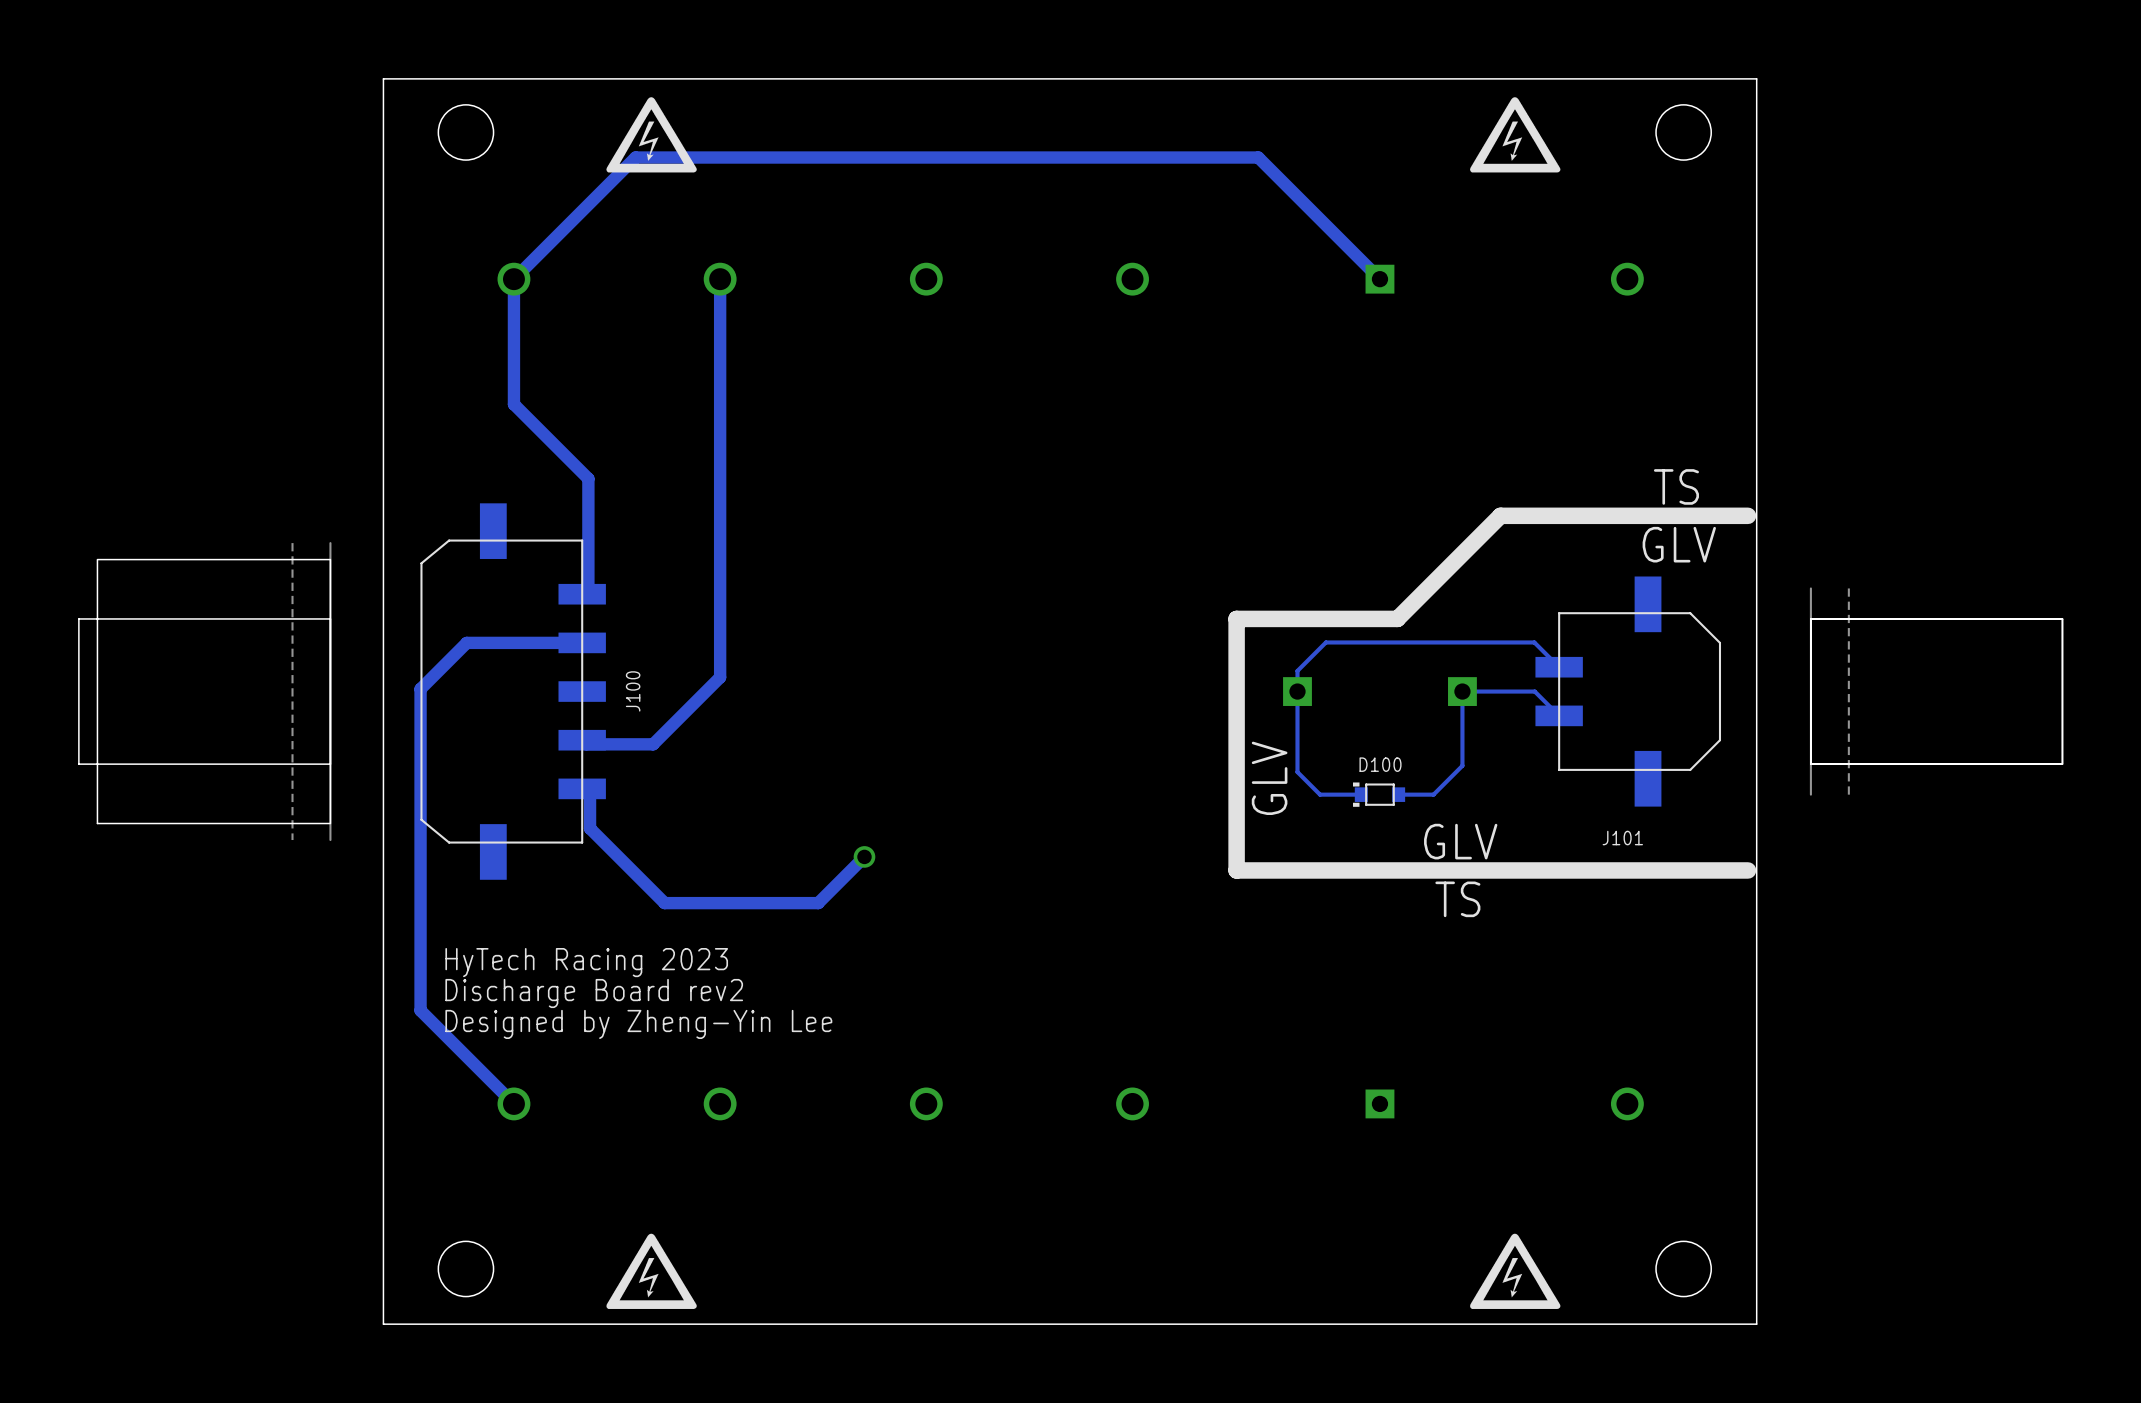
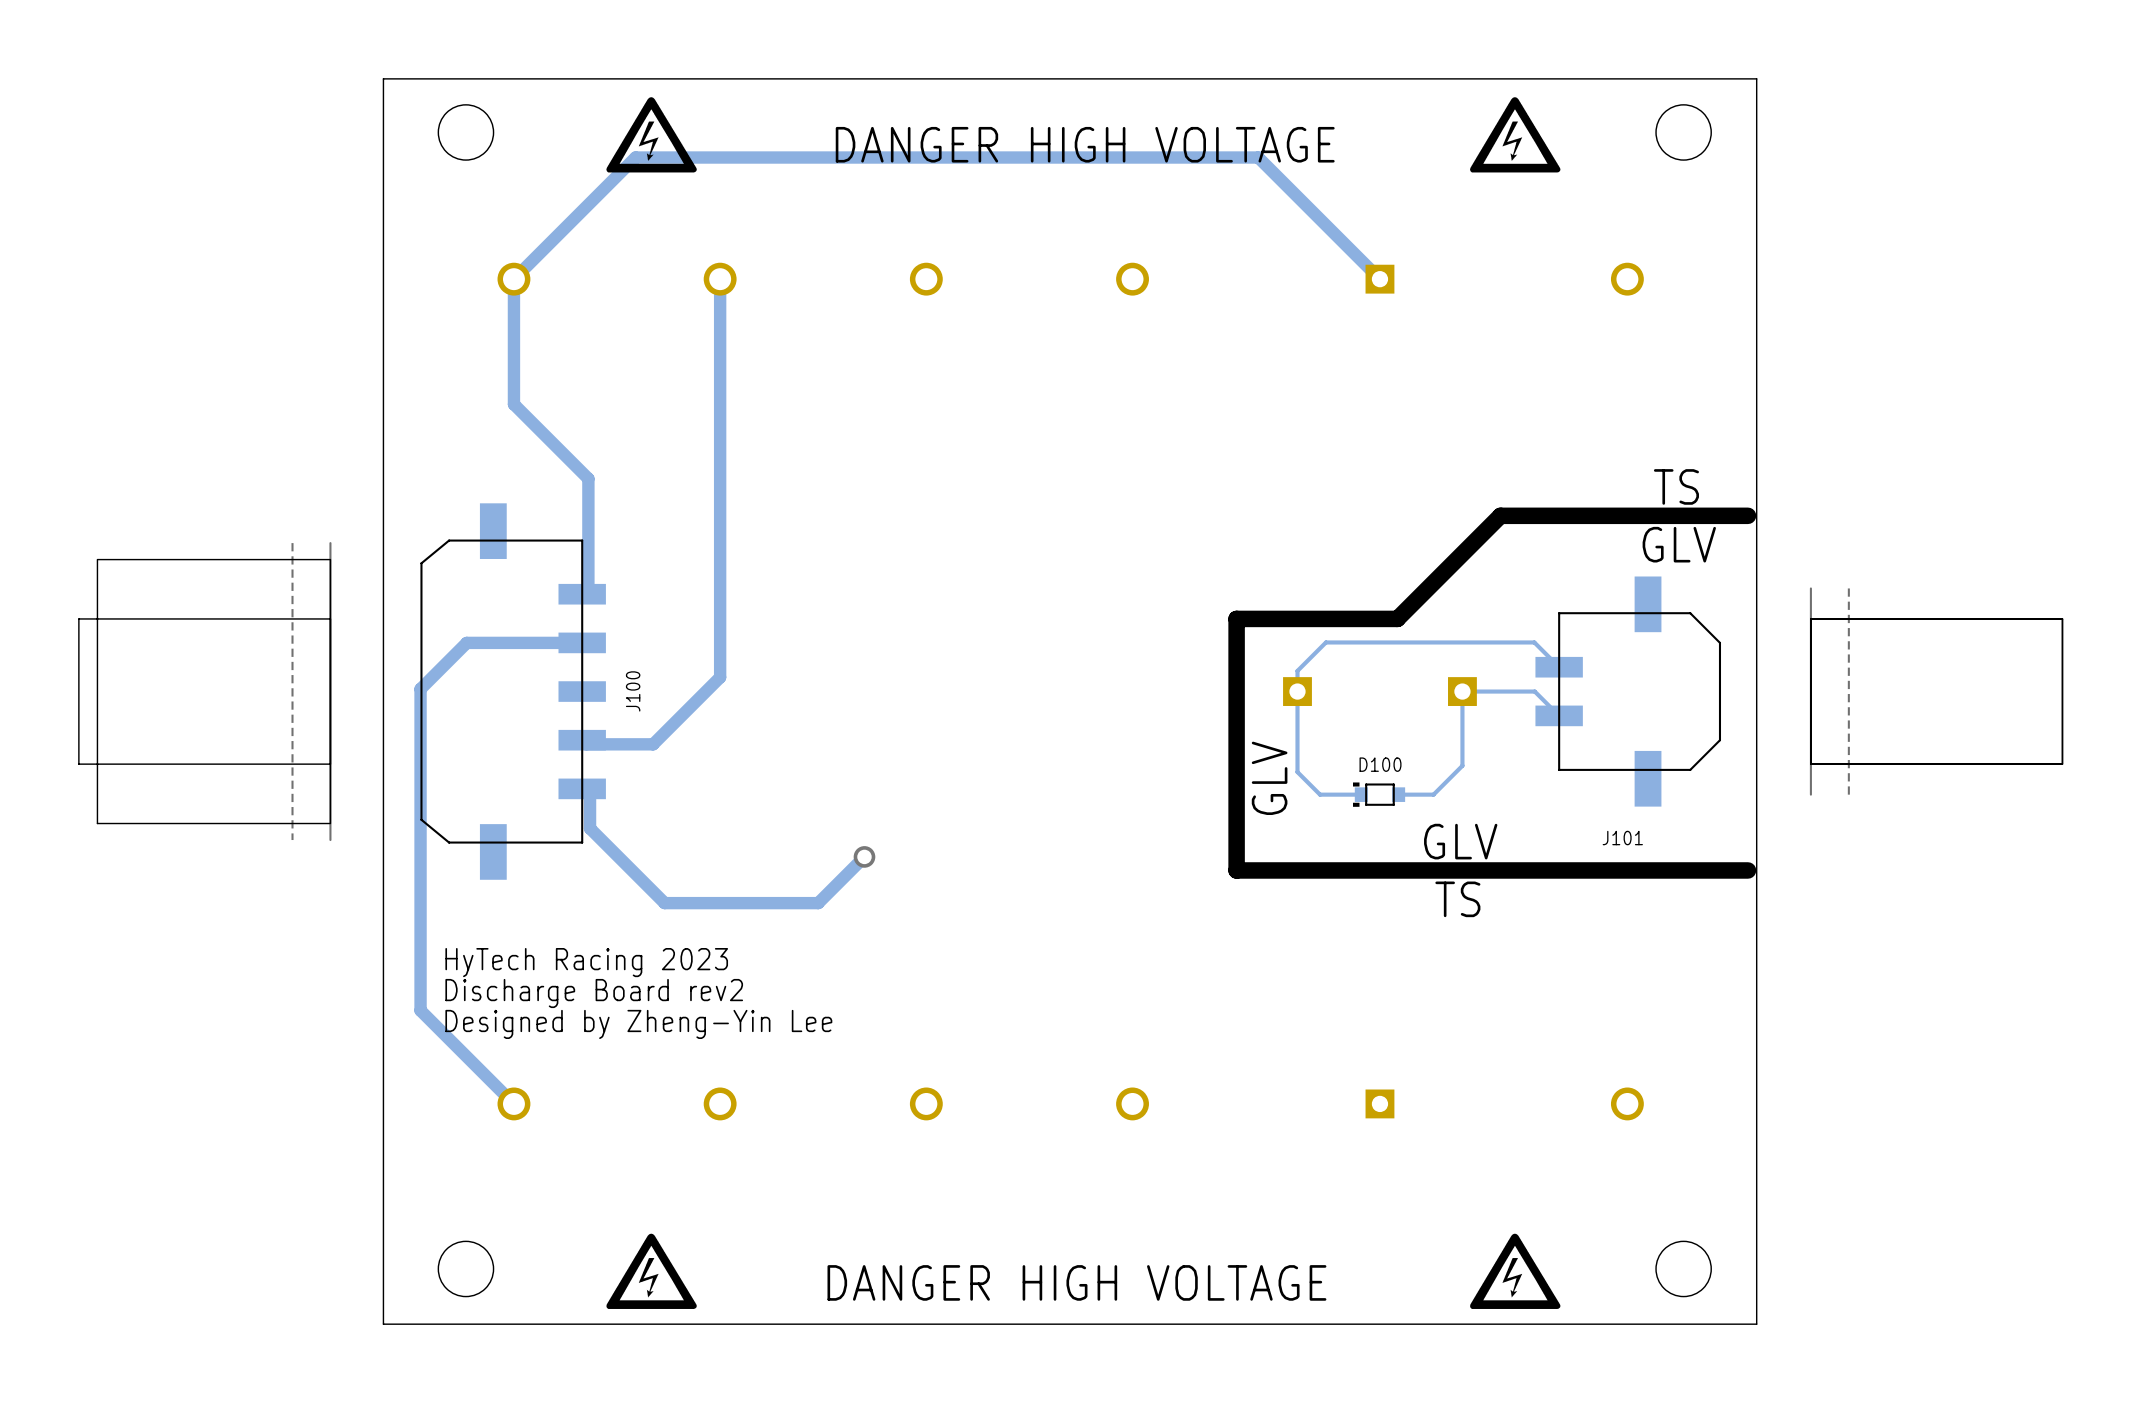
drawing: none -> [835, 126, 1335, 163]
drawing: none -> [827, 1265, 1327, 1301]

